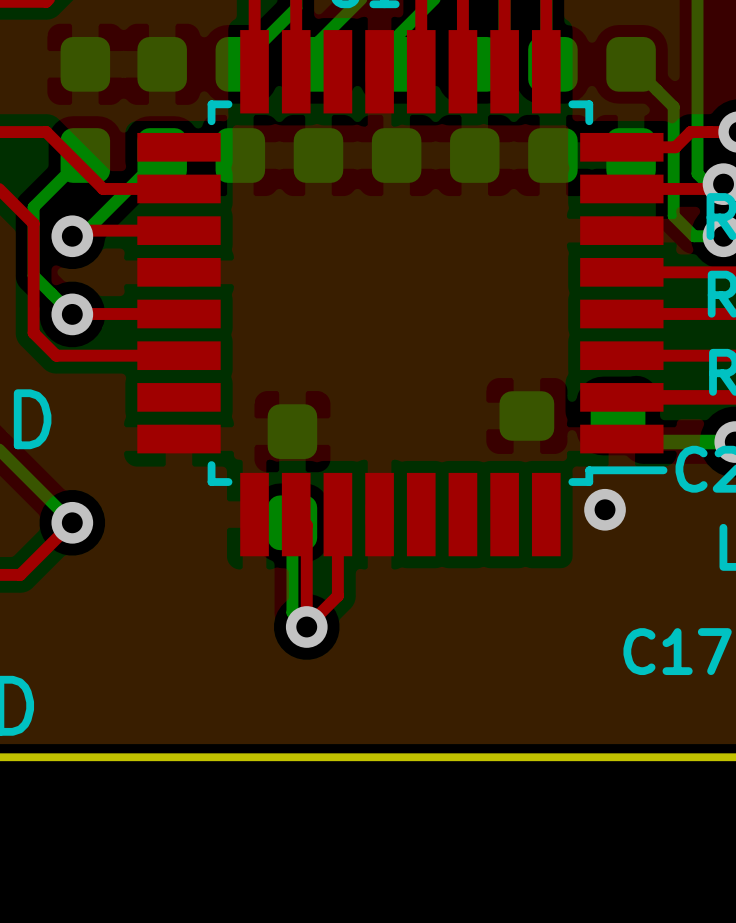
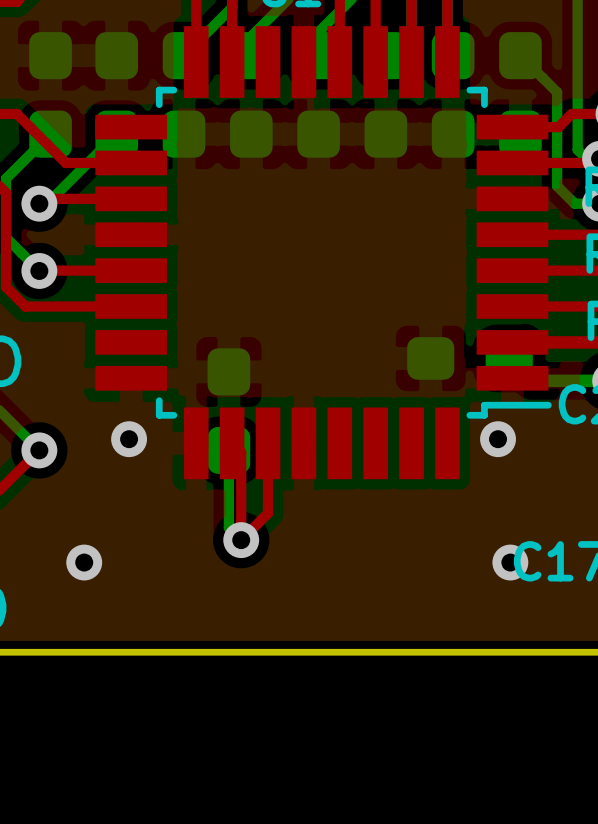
via: none -> (129, 439)
via: none -> (84, 562)
via: none -> (510, 562)

